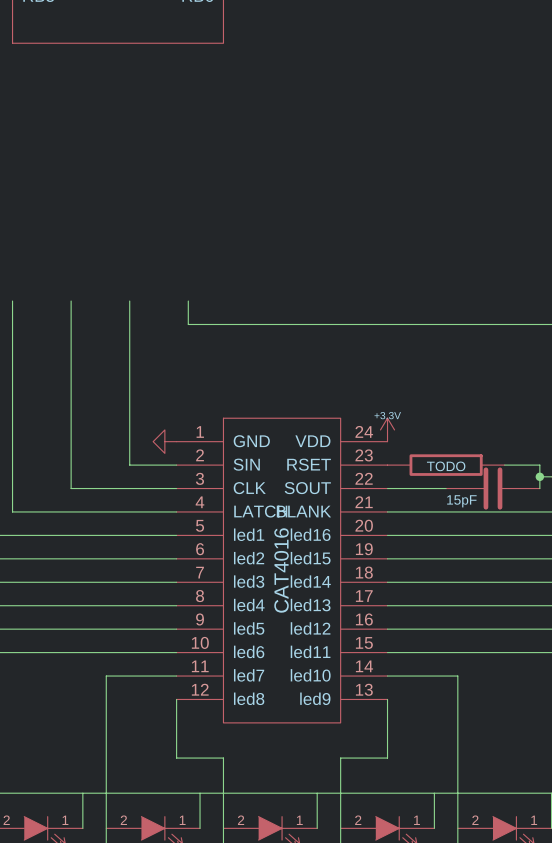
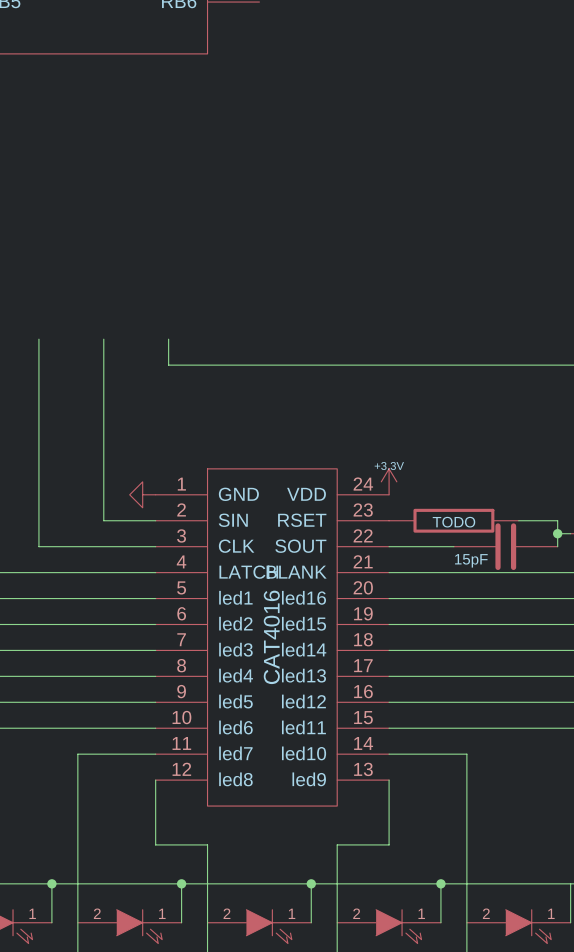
junction: none -> (51, 883)
junction: none -> (181, 883)
junction: none -> (311, 883)
junction: none -> (440, 883)

